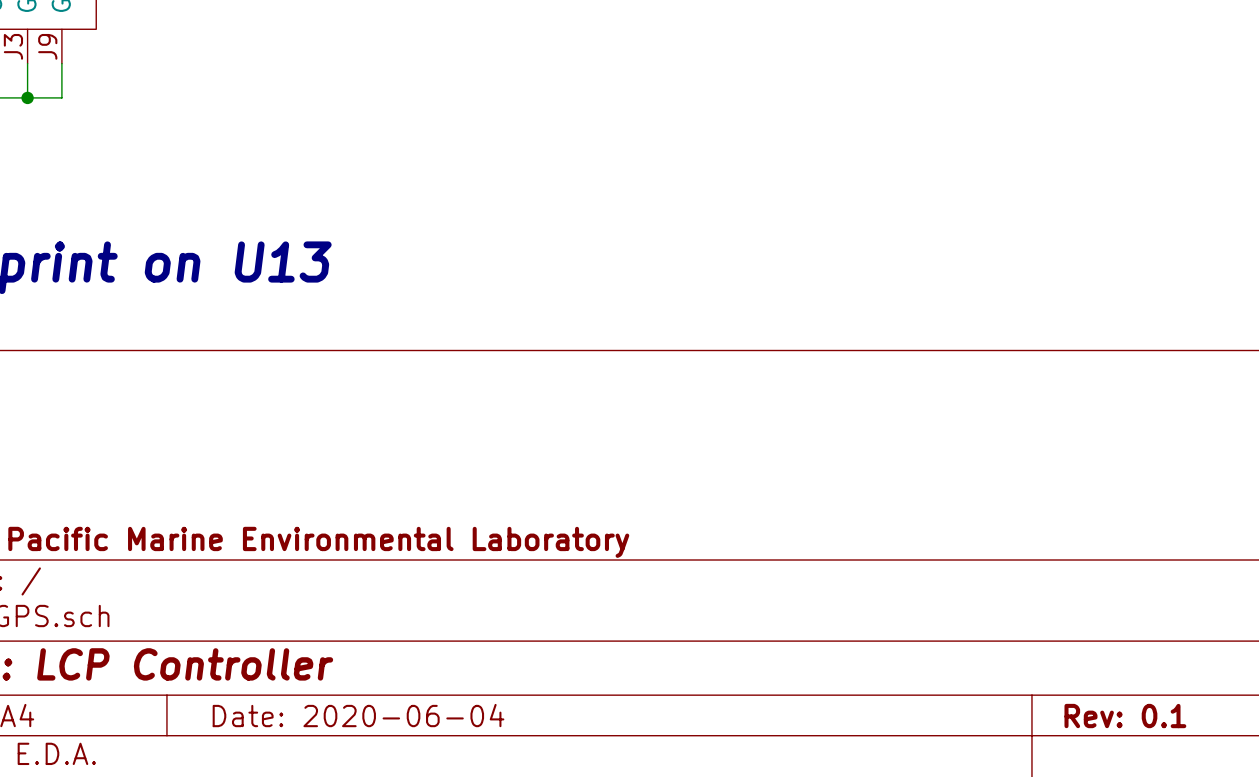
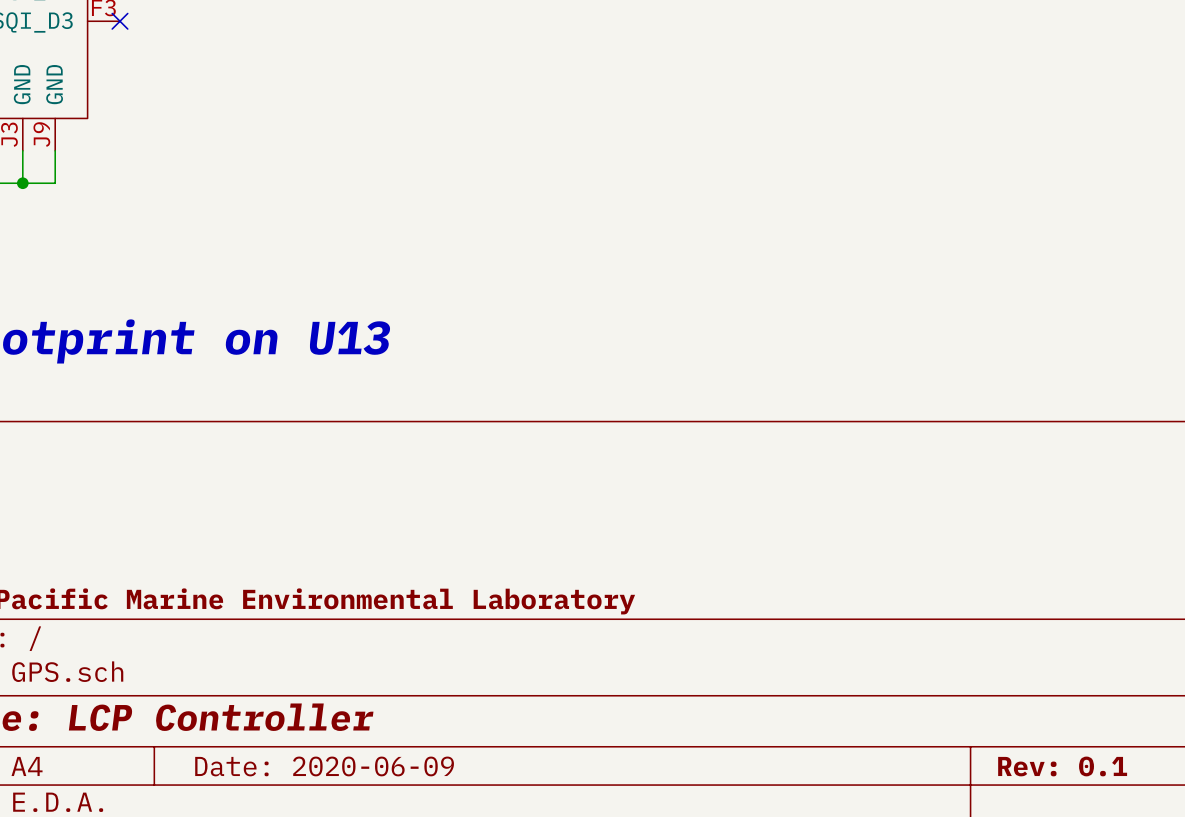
title block: Date: 2020-06-04 (358, 715) -> Date: 2020-06-09 (324, 766)

